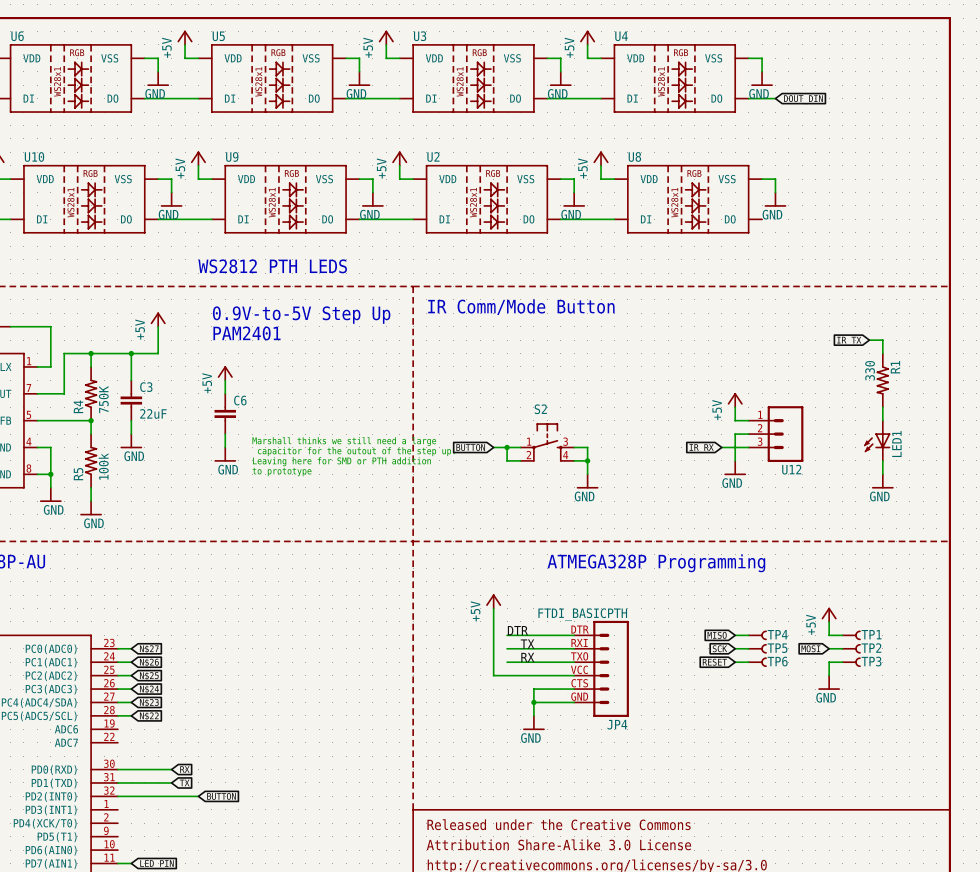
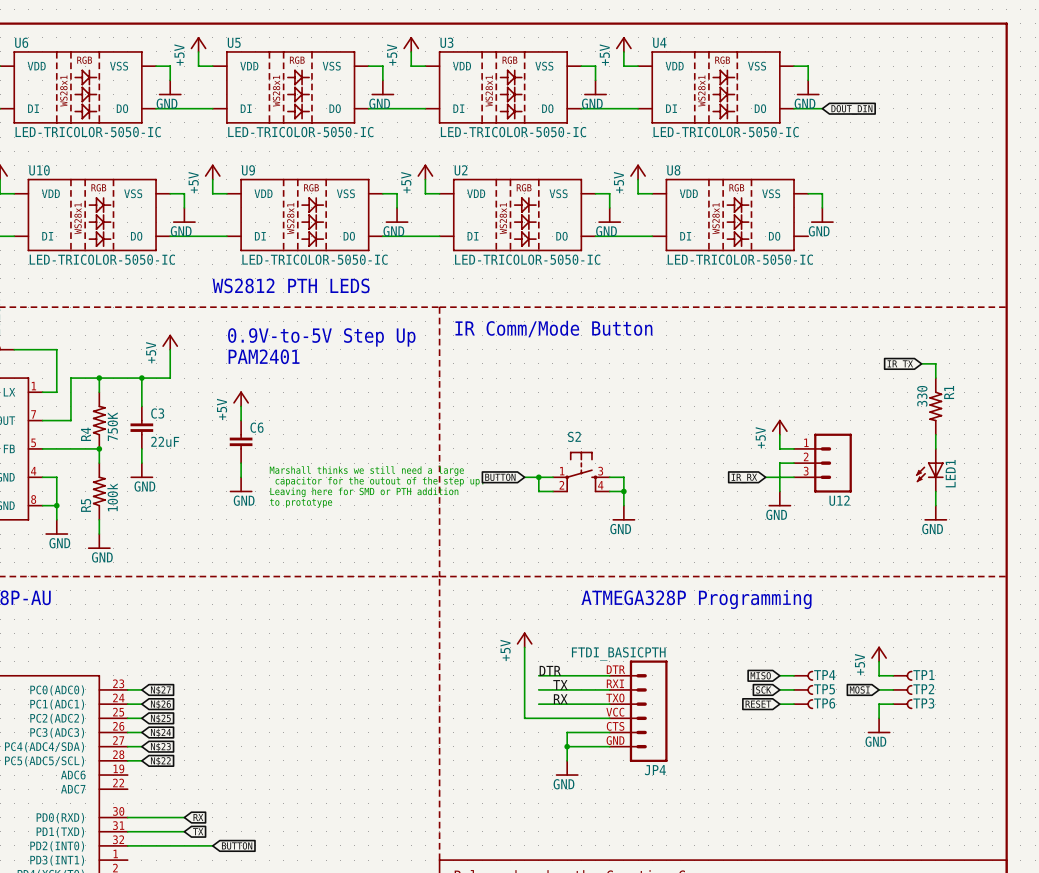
U6 value: none -> LED-TRICOLOR-5050-IC (88, 132)
U5 value: none -> LED-TRICOLOR-5050-IC (300, 132)
U3 value: none -> LED-TRICOLOR-5050-IC (513, 132)
U4 value: none -> LED-TRICOLOR-5050-IC (726, 132)
U10 value: none -> LED-TRICOLOR-5050-IC (102, 259)
U9 value: none -> LED-TRICOLOR-5050-IC (315, 259)
U2 value: none -> LED-TRICOLOR-5050-IC (527, 259)
U8 value: none -> LED-TRICOLOR-5050-IC (740, 259)

